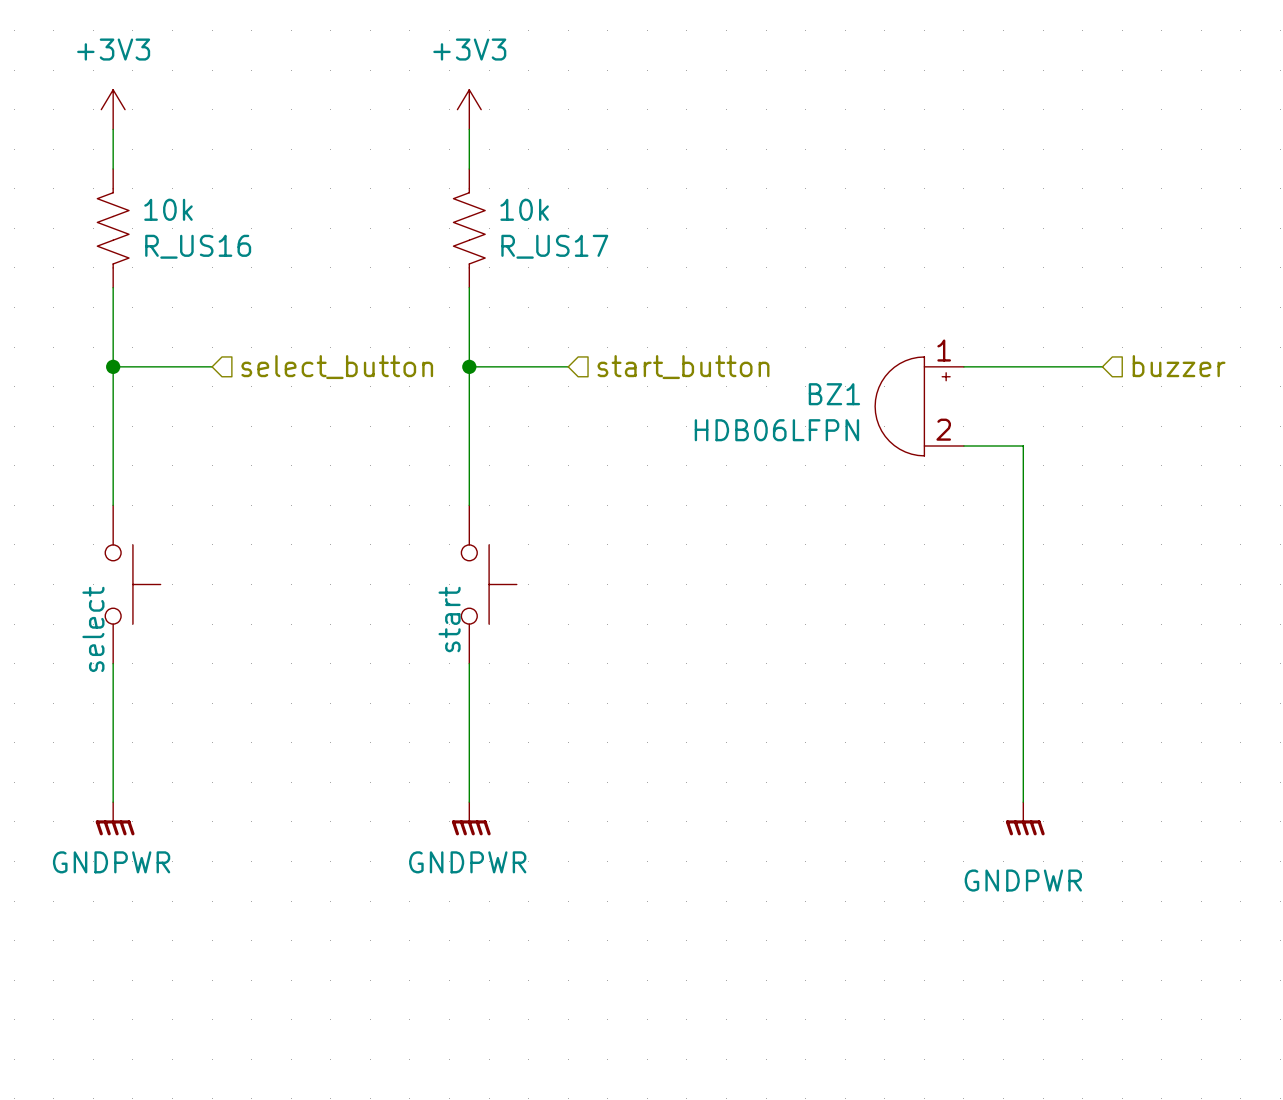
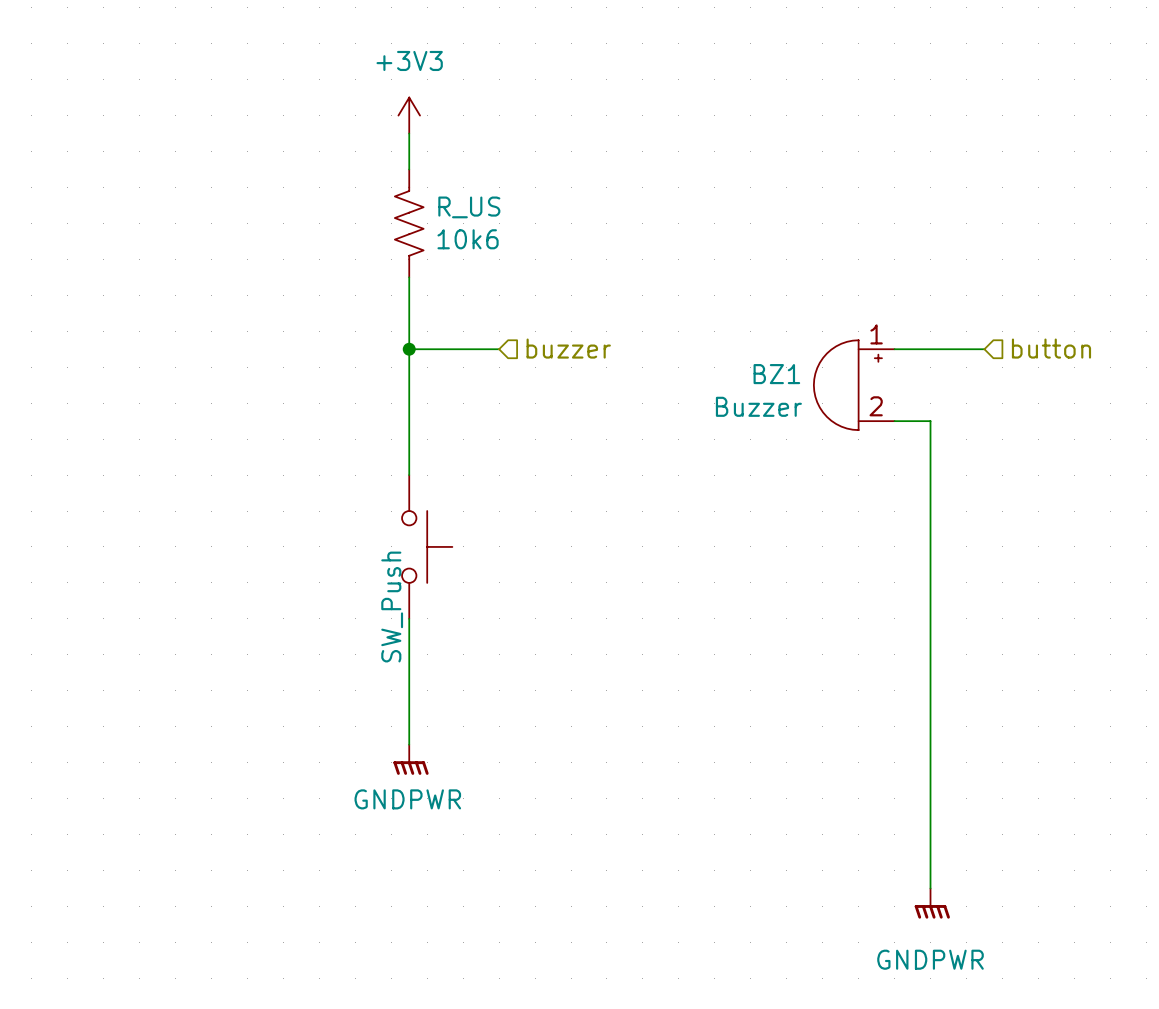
power symbol: +3V3 (113, 109) -> none
wire: (113, 129) (113, 169) -> none
R_US17 value: 10k (524, 209) -> R_US (469, 207)
R_US16: 10k (113, 228) -> none
R_US17 name: R_US17 (554, 246) -> 10k6 (468, 239)
wire: (113, 287) (113, 505) -> none
wire: (113, 366) (212, 366) -> none
junction: (113, 366) -> none
hierarchical label: buzzer (1179, 366) -> button (1051, 348)
hierarchical label: select_button (337, 367) -> none
hierarchical label: start_button (683, 367) -> buzzer (568, 348)
BZ1 position: (919, 406) -> (854, 385)
BZ1 value: HDB06LFPN (776, 430) -> Buzzer (758, 406)
wire: (1023, 446) (1023, 802) -> (912, 421) (930, 421) (930, 888)
part: select (132, 584) -> none
part value: start (449, 619) -> SW_Push (392, 607)
wire: (113, 663) (113, 802) -> none
power symbol: GNDPWR (115, 818) -> none
power symbol position: GNDPWR (1025, 818) -> GNDPWR (932, 903)

